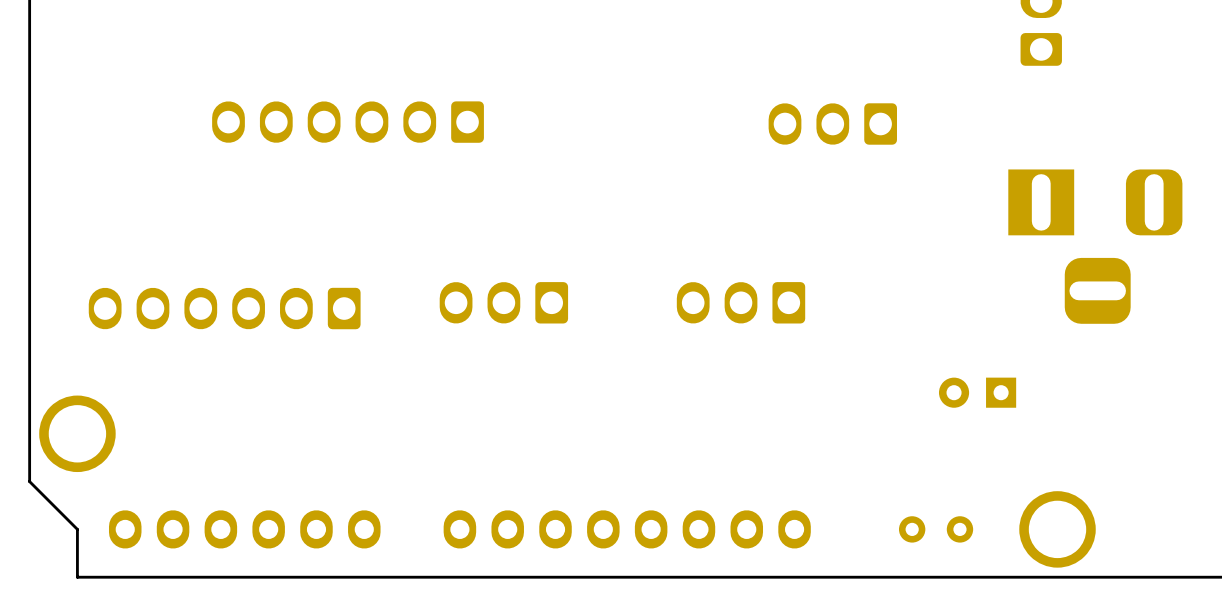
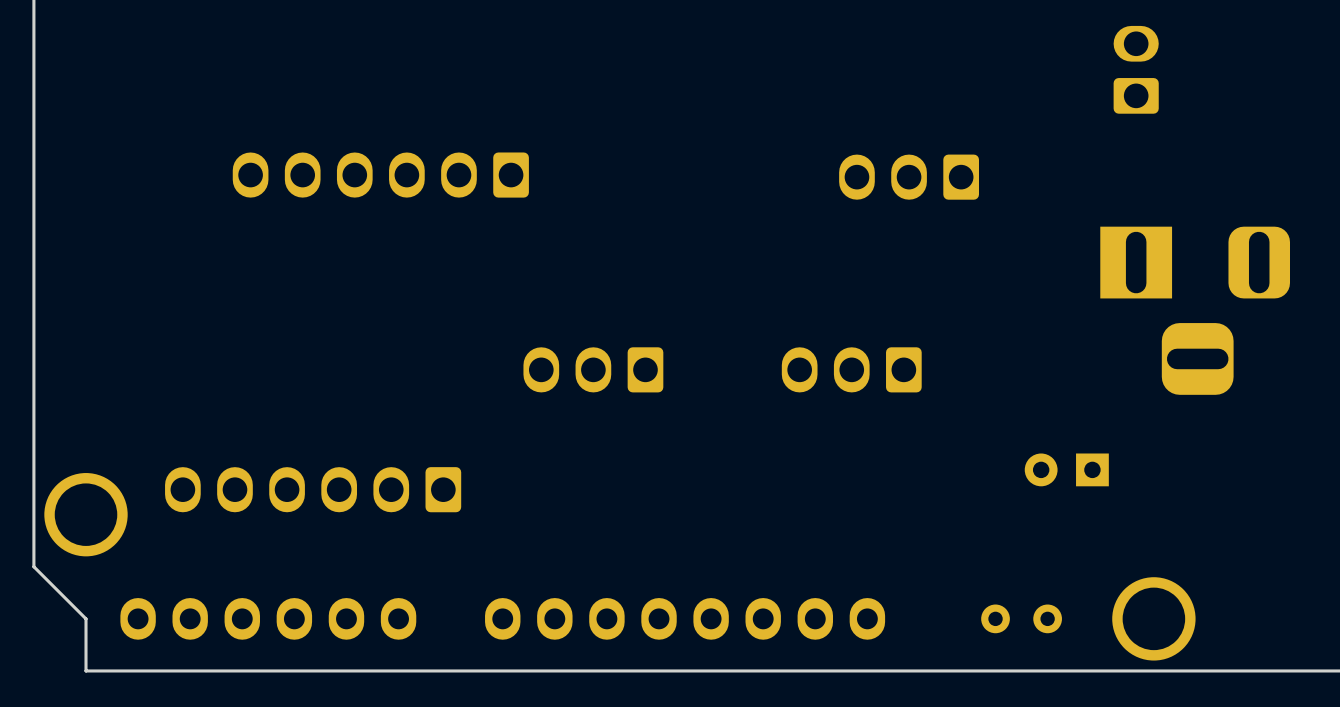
part position: (503, 302) -> (593, 369)
part position: (741, 302) -> (851, 369)
part position: (224, 308) -> (313, 489)

